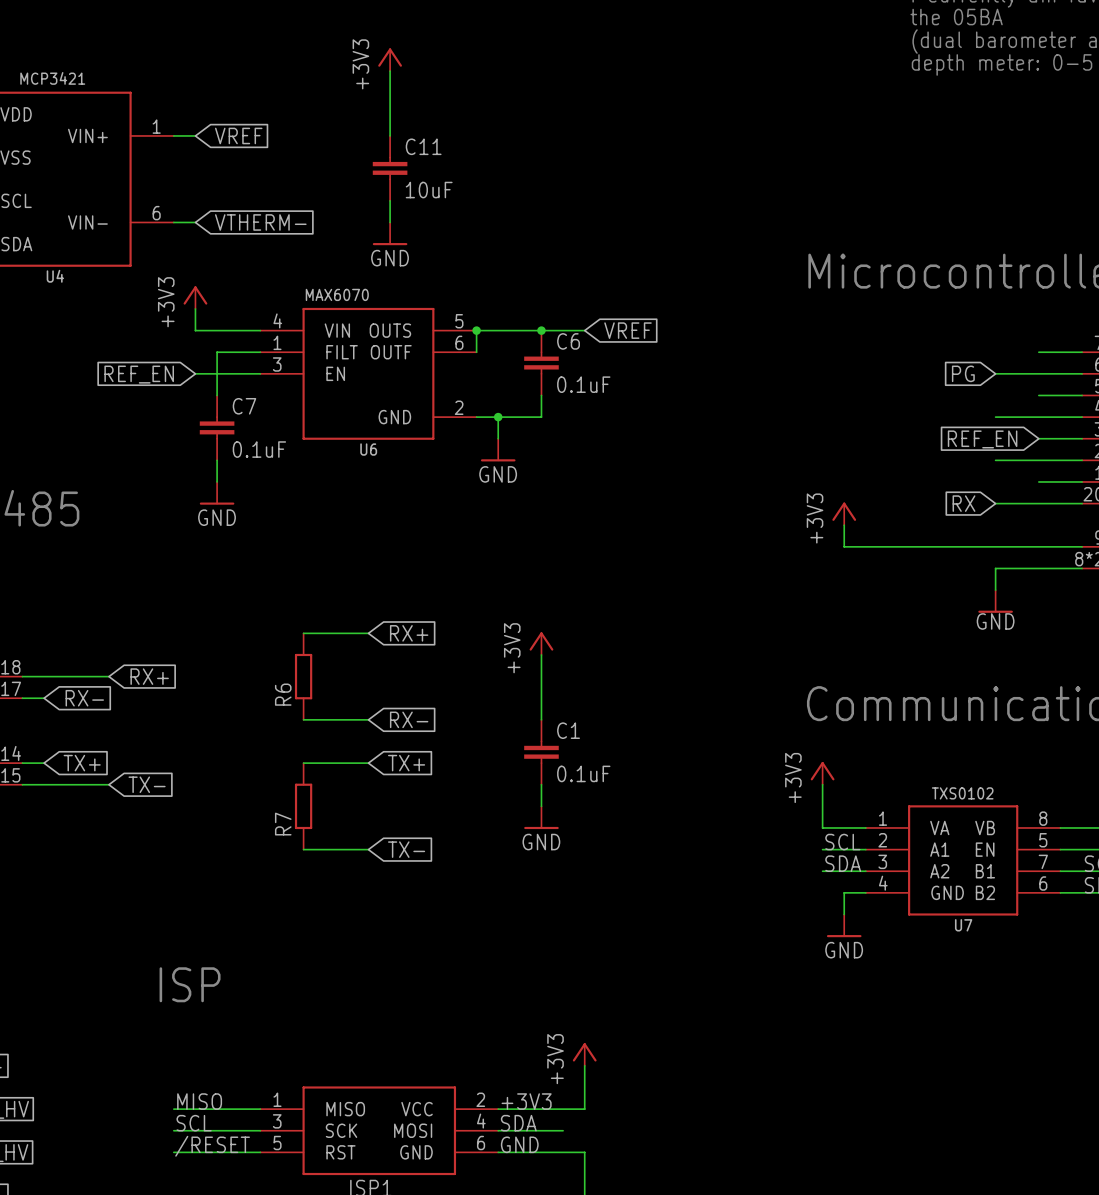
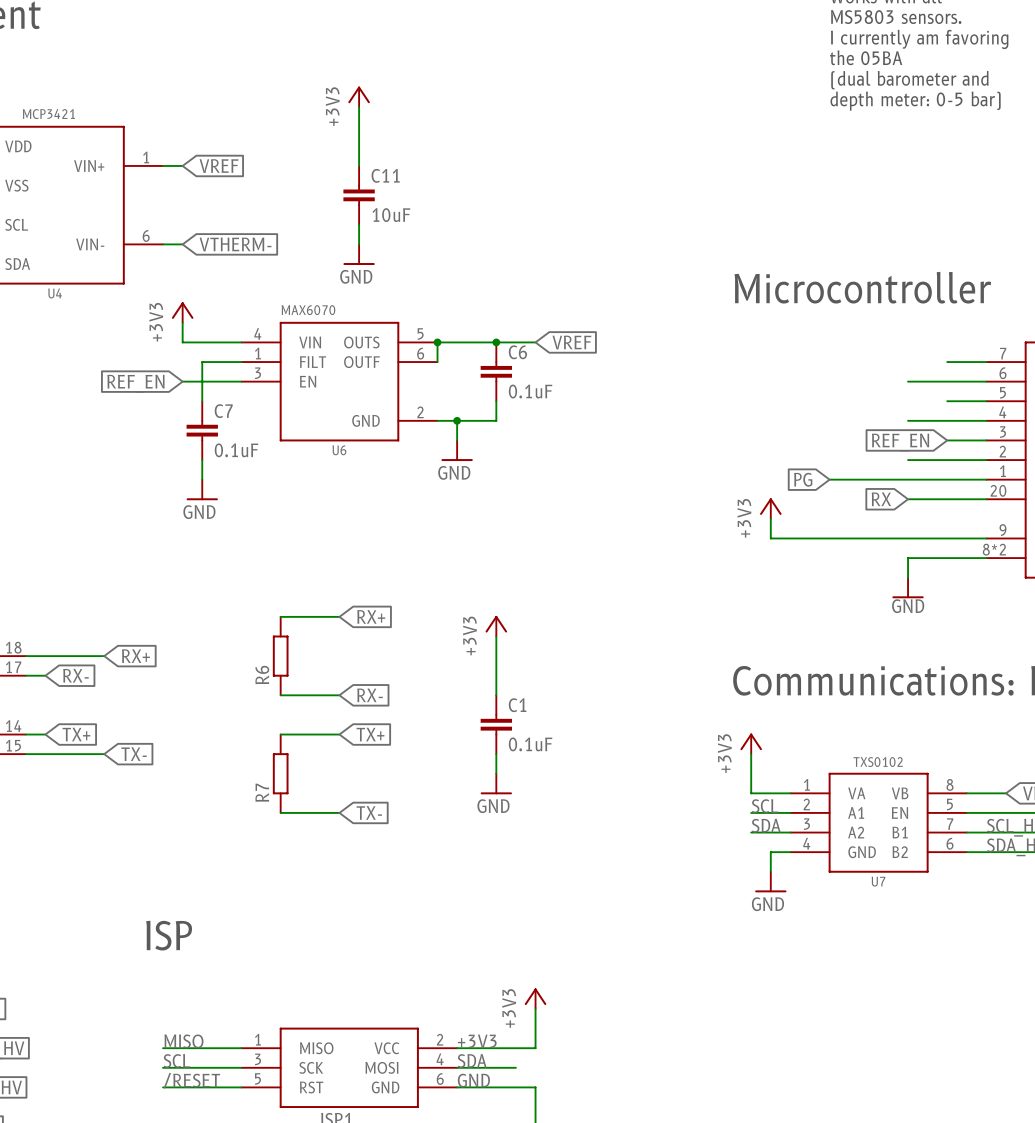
global label position: PG (963, 373) -> PG (803, 479)
wire: none -> (829, 479) (947, 479)

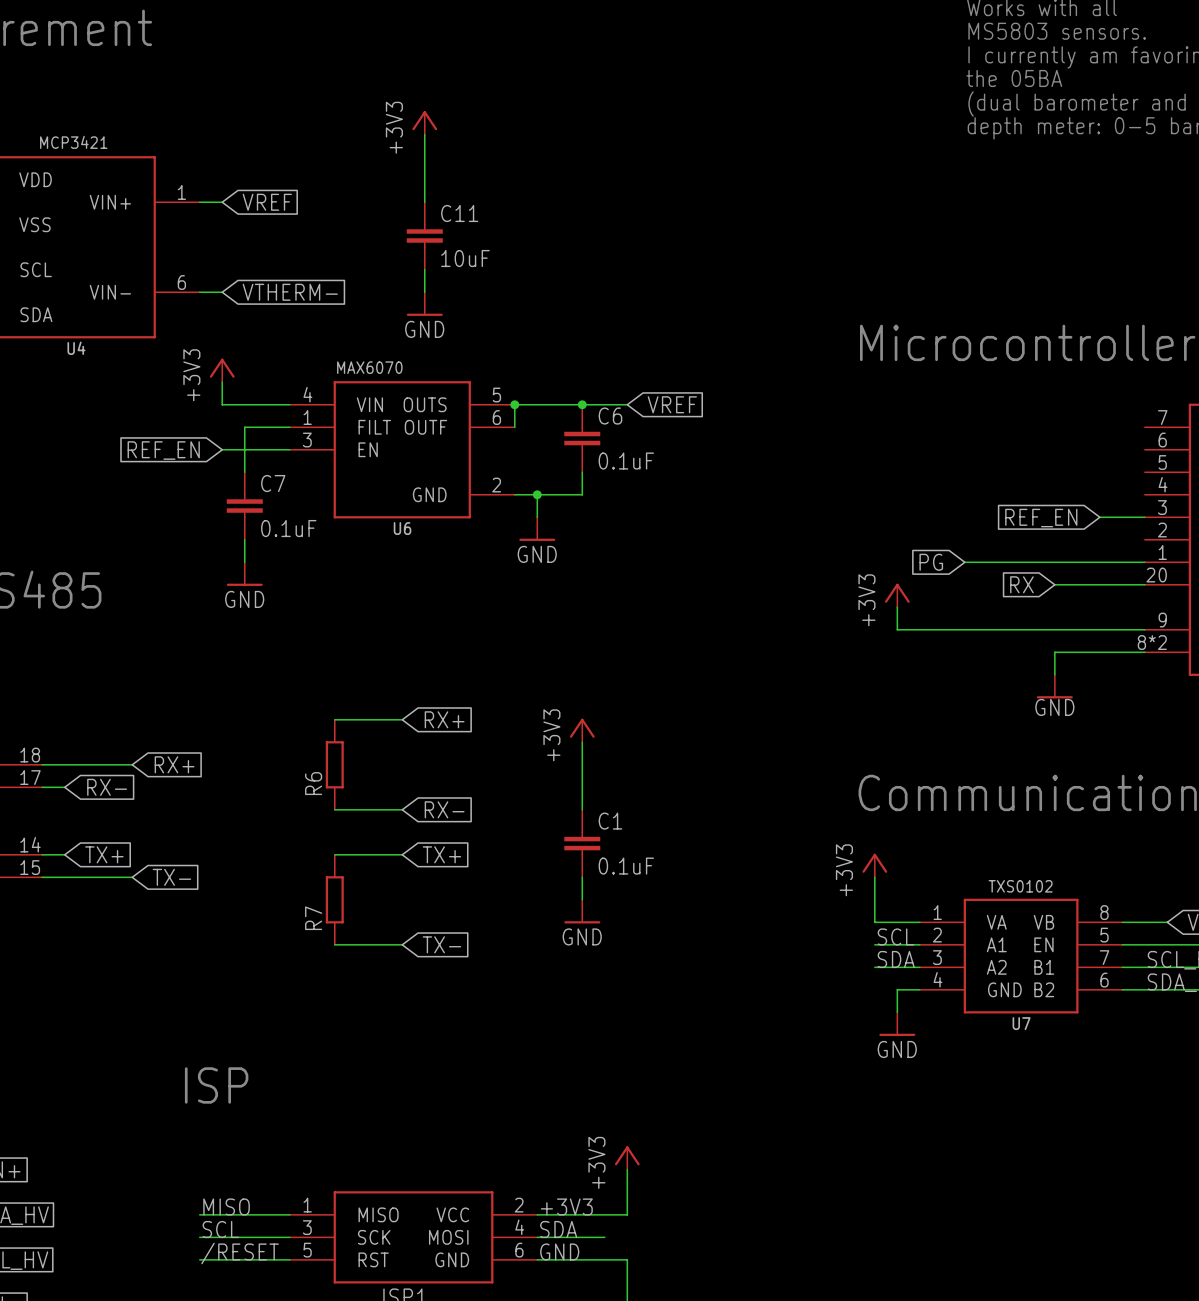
wire: (947, 362) (986, 362) -> none
wire: (908, 381) (986, 381) -> none
wire: (947, 401) (986, 401) -> none
wire: (908, 420) (986, 420) -> none
wire: (908, 460) (986, 460) -> none

